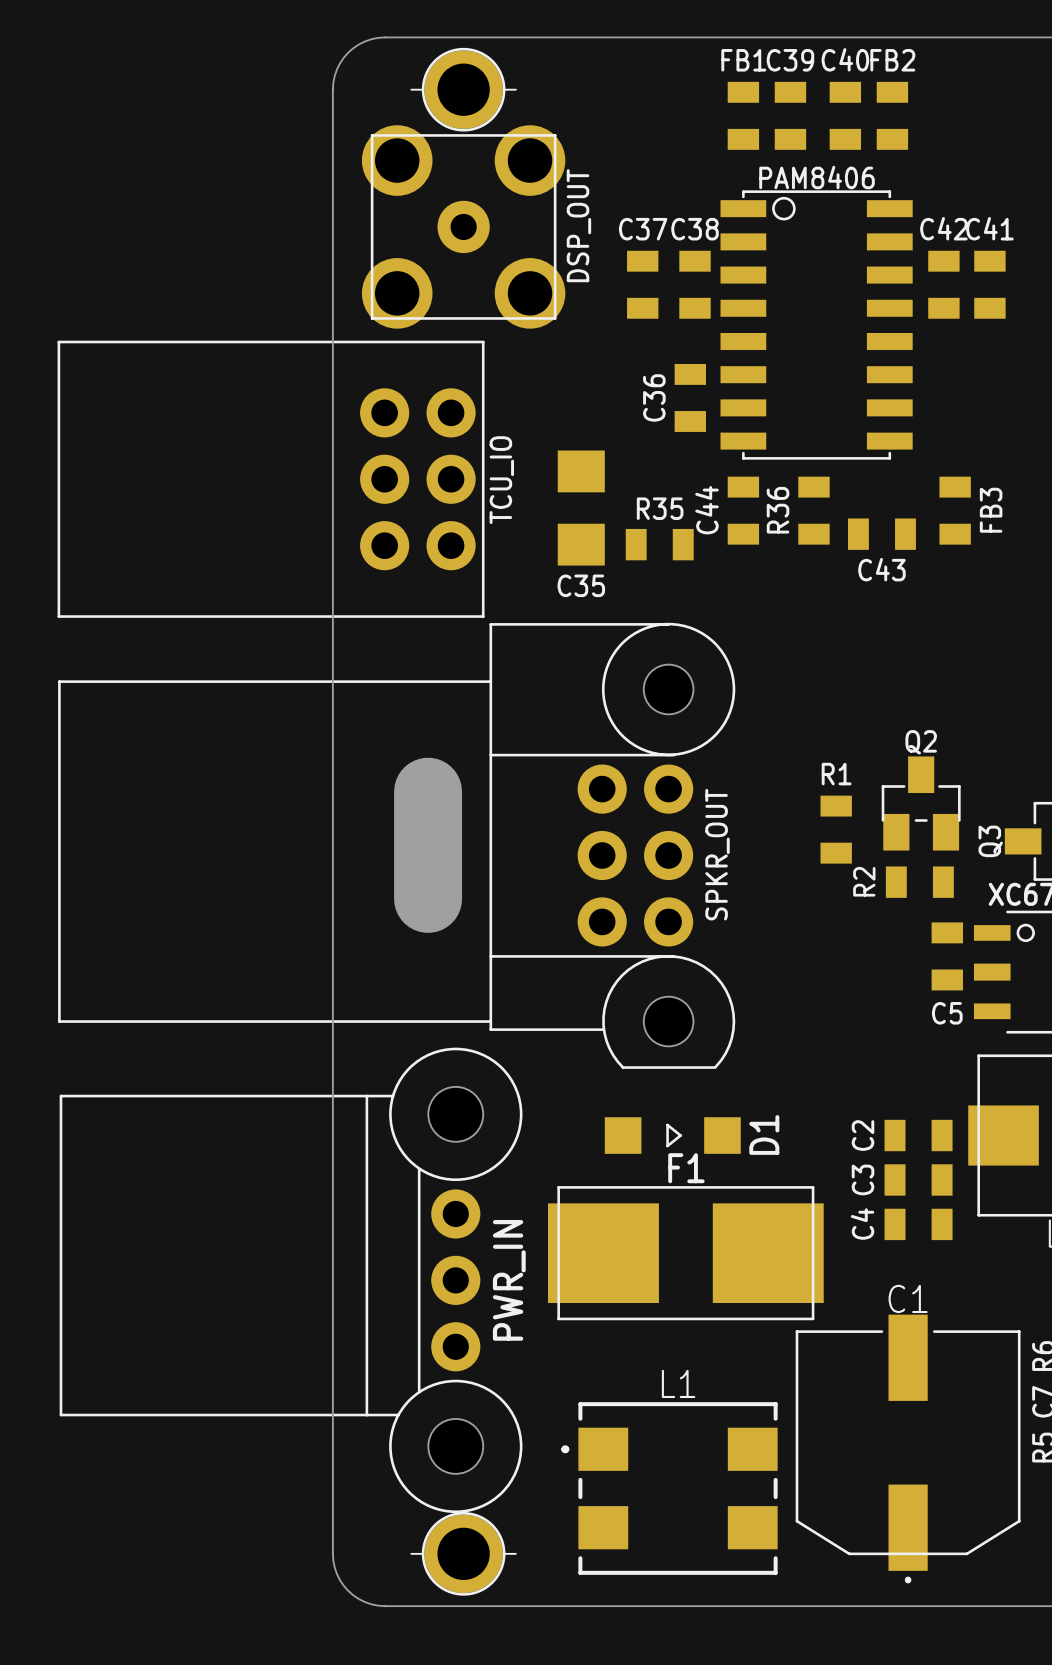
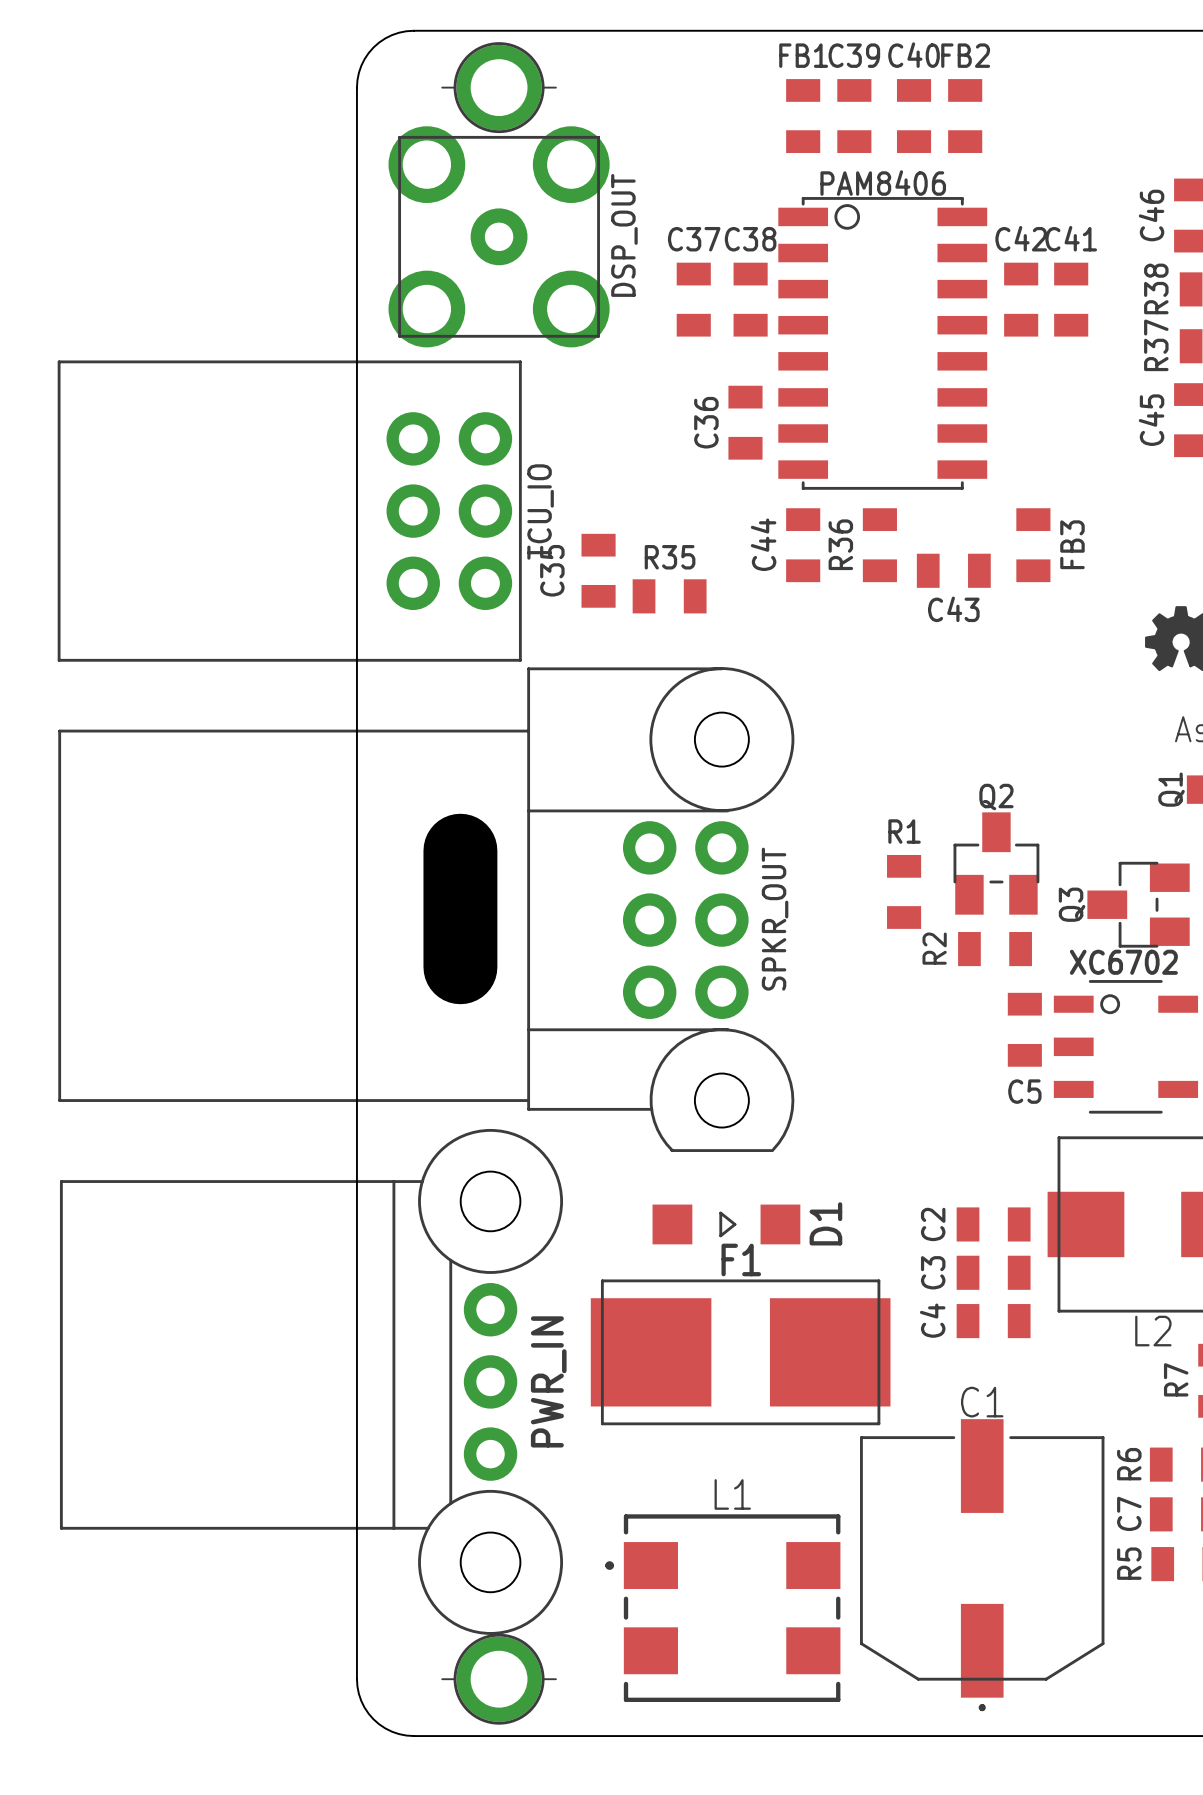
C35 footprint: [557, 450, 605, 566] -> [581, 533, 616, 608]
R35 position: (659, 544) -> (669, 596)
C35 name position: C35 (581, 585) -> C35 (552, 570)

